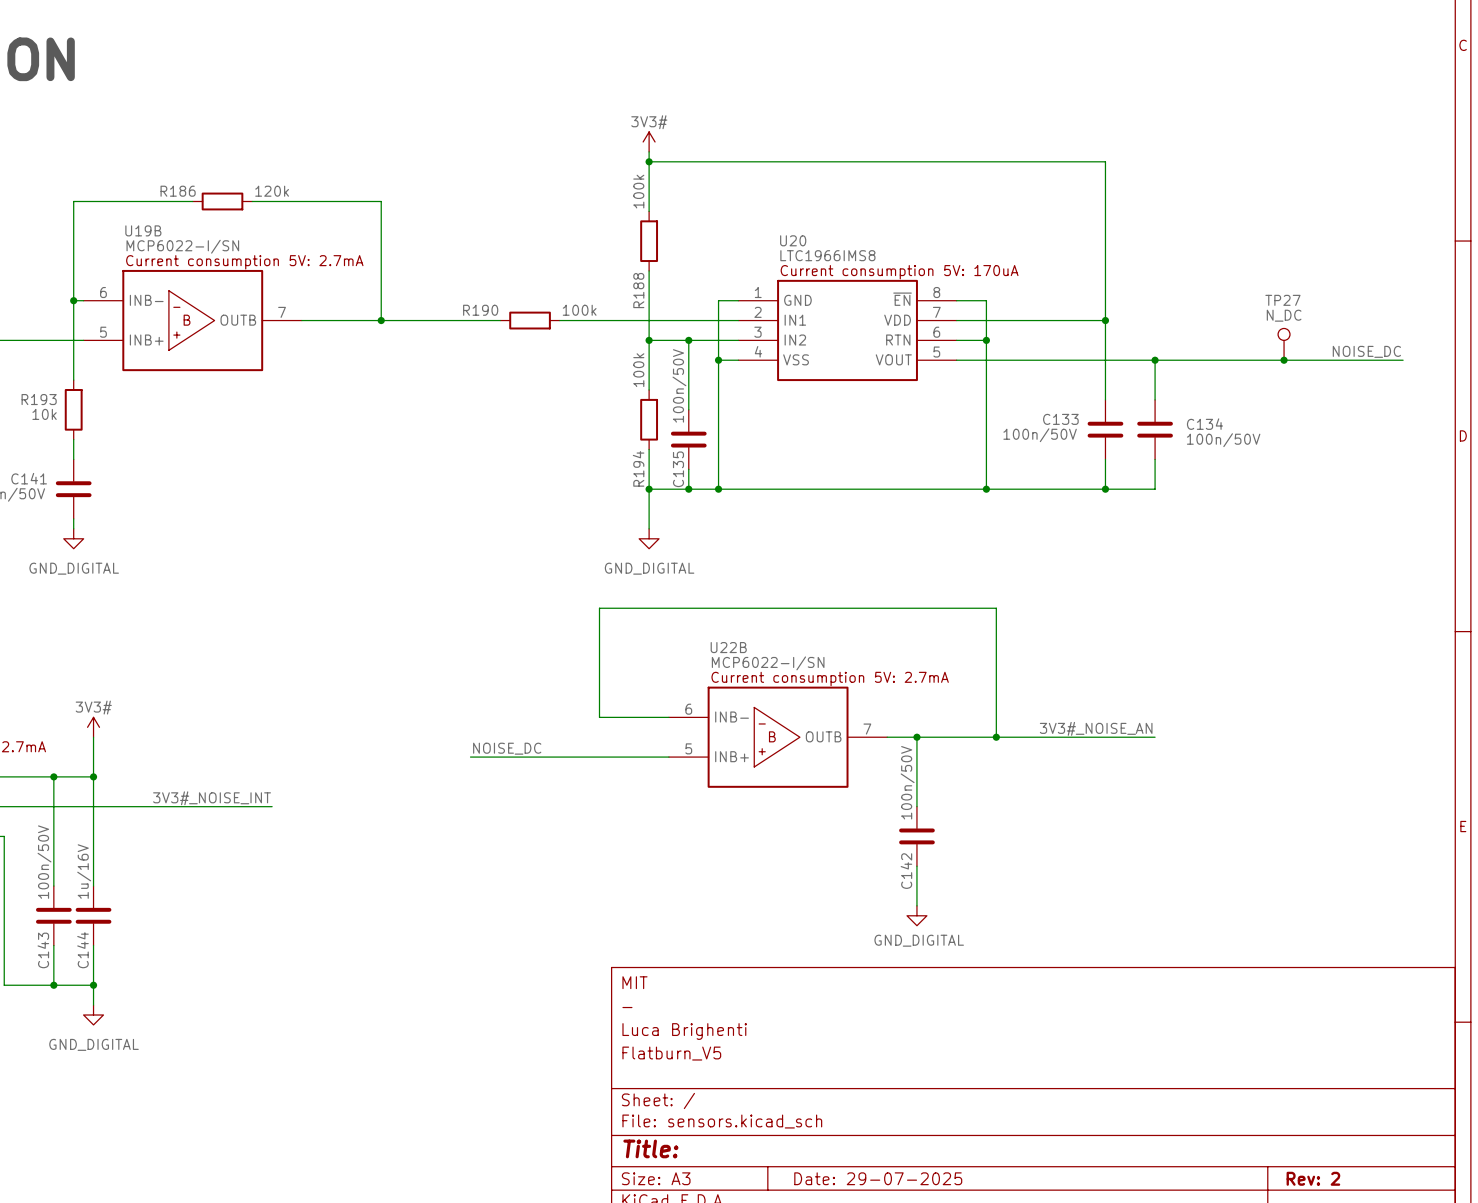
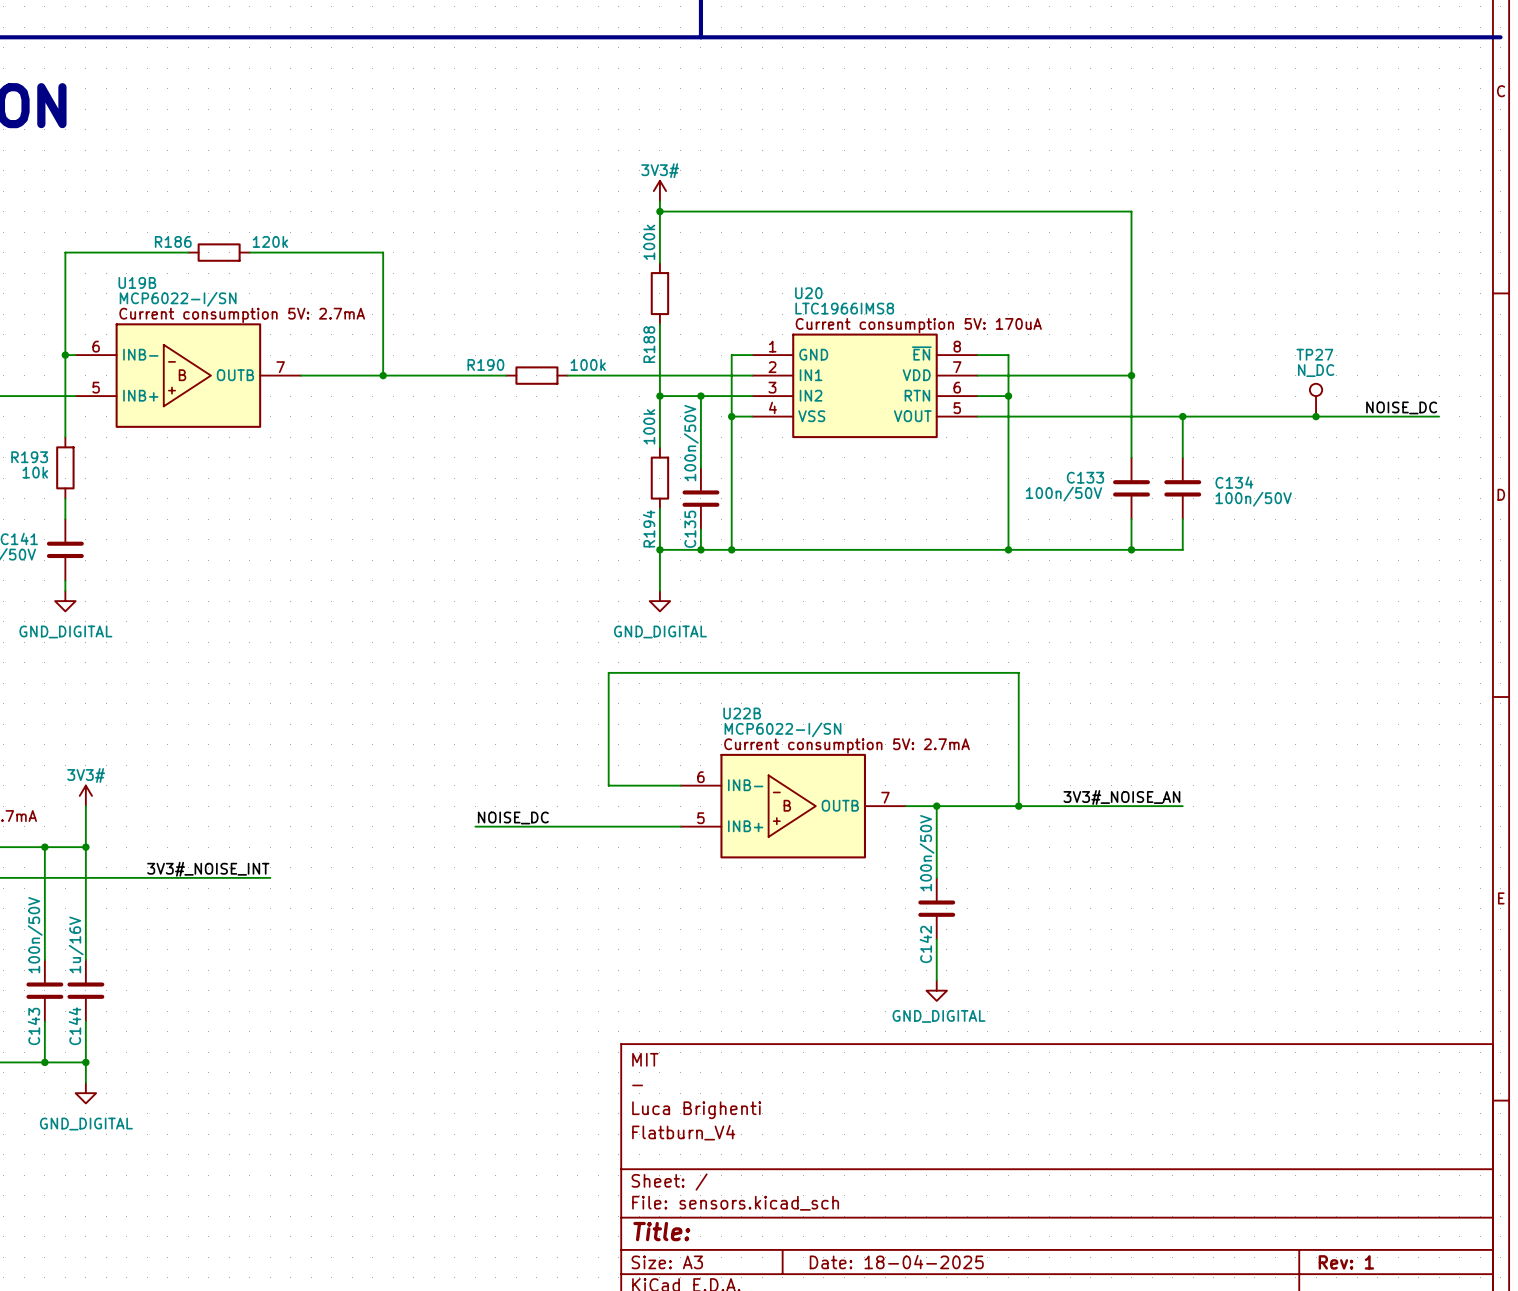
title block: Flatburn_V5 (671, 1053) -> Flatburn_V4 (683, 1132)
title block: Date: 29-07-2025 (878, 1178) -> Date: 18-04-2025 (896, 1262)
title block: Rev: 2 (1313, 1178) -> Rev: 1 (1346, 1262)

